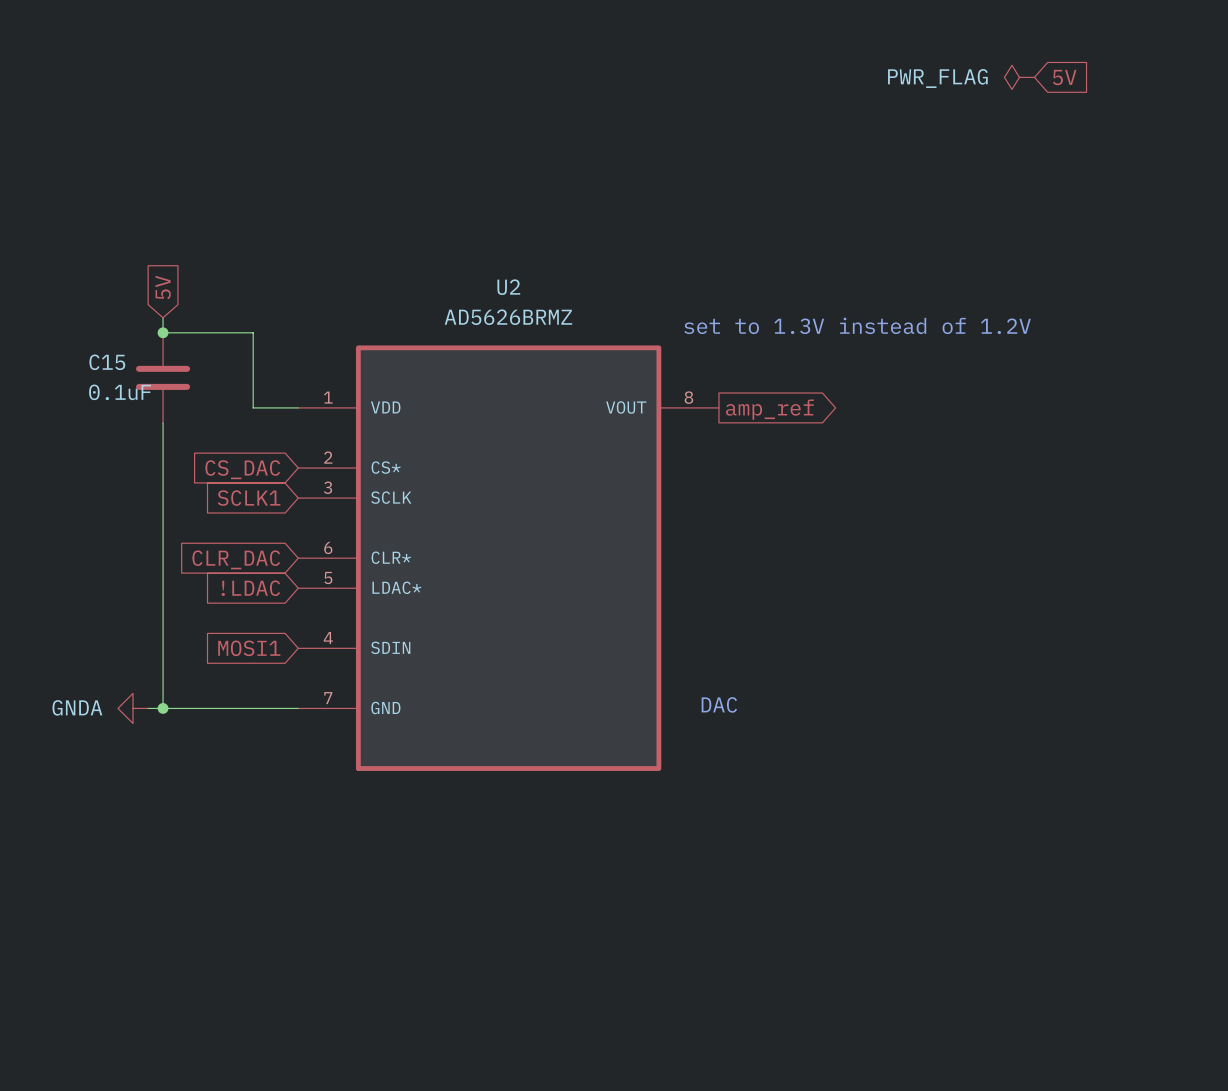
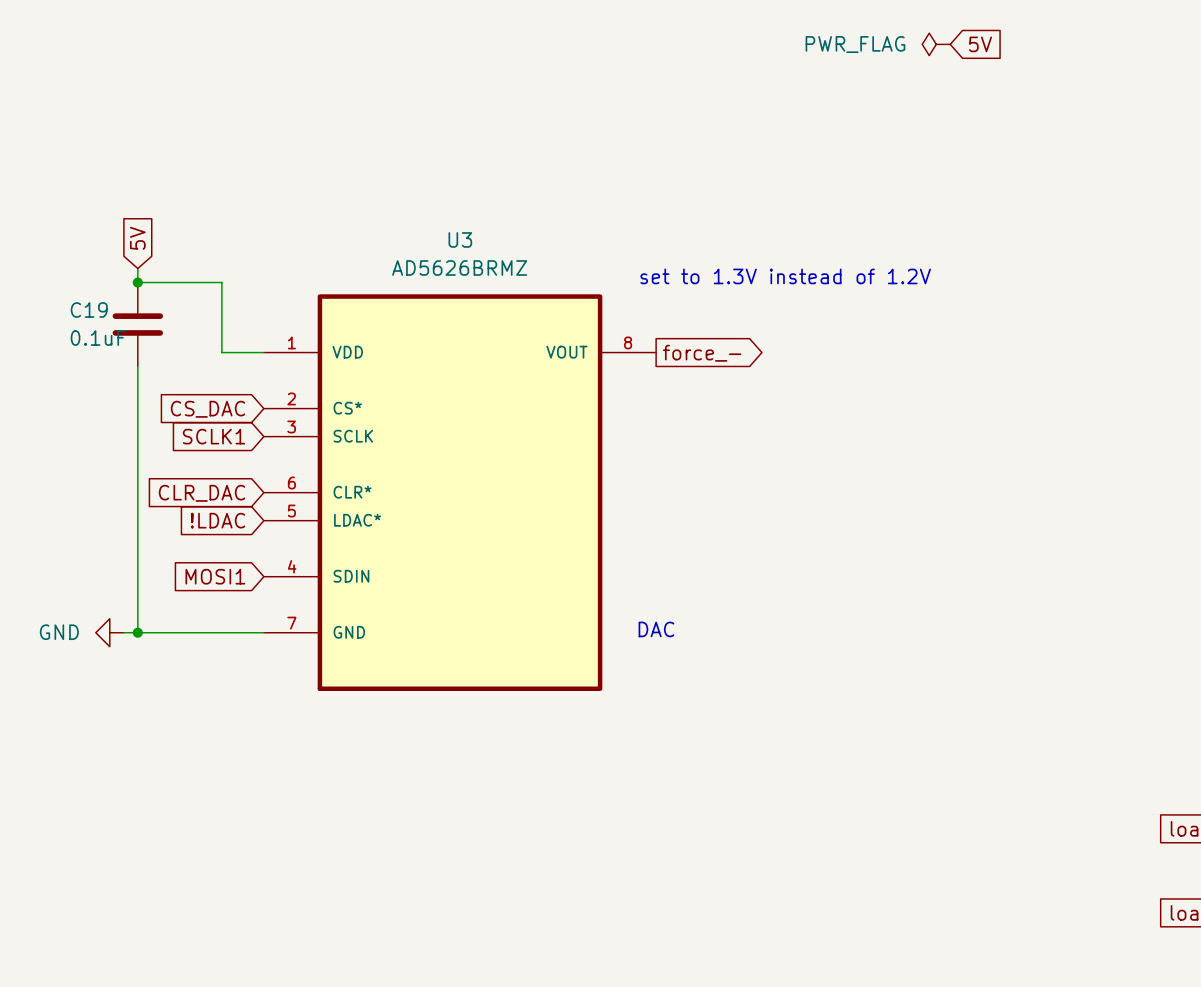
U2 name: U2 (508, 287) -> U3 (460, 239)
C15 name: C15 (107, 362) -> C19 (89, 310)
global label: amp_ref (769, 409) -> force_- (702, 353)
power symbol: GNDA (132, 708) -> GND (109, 632)

